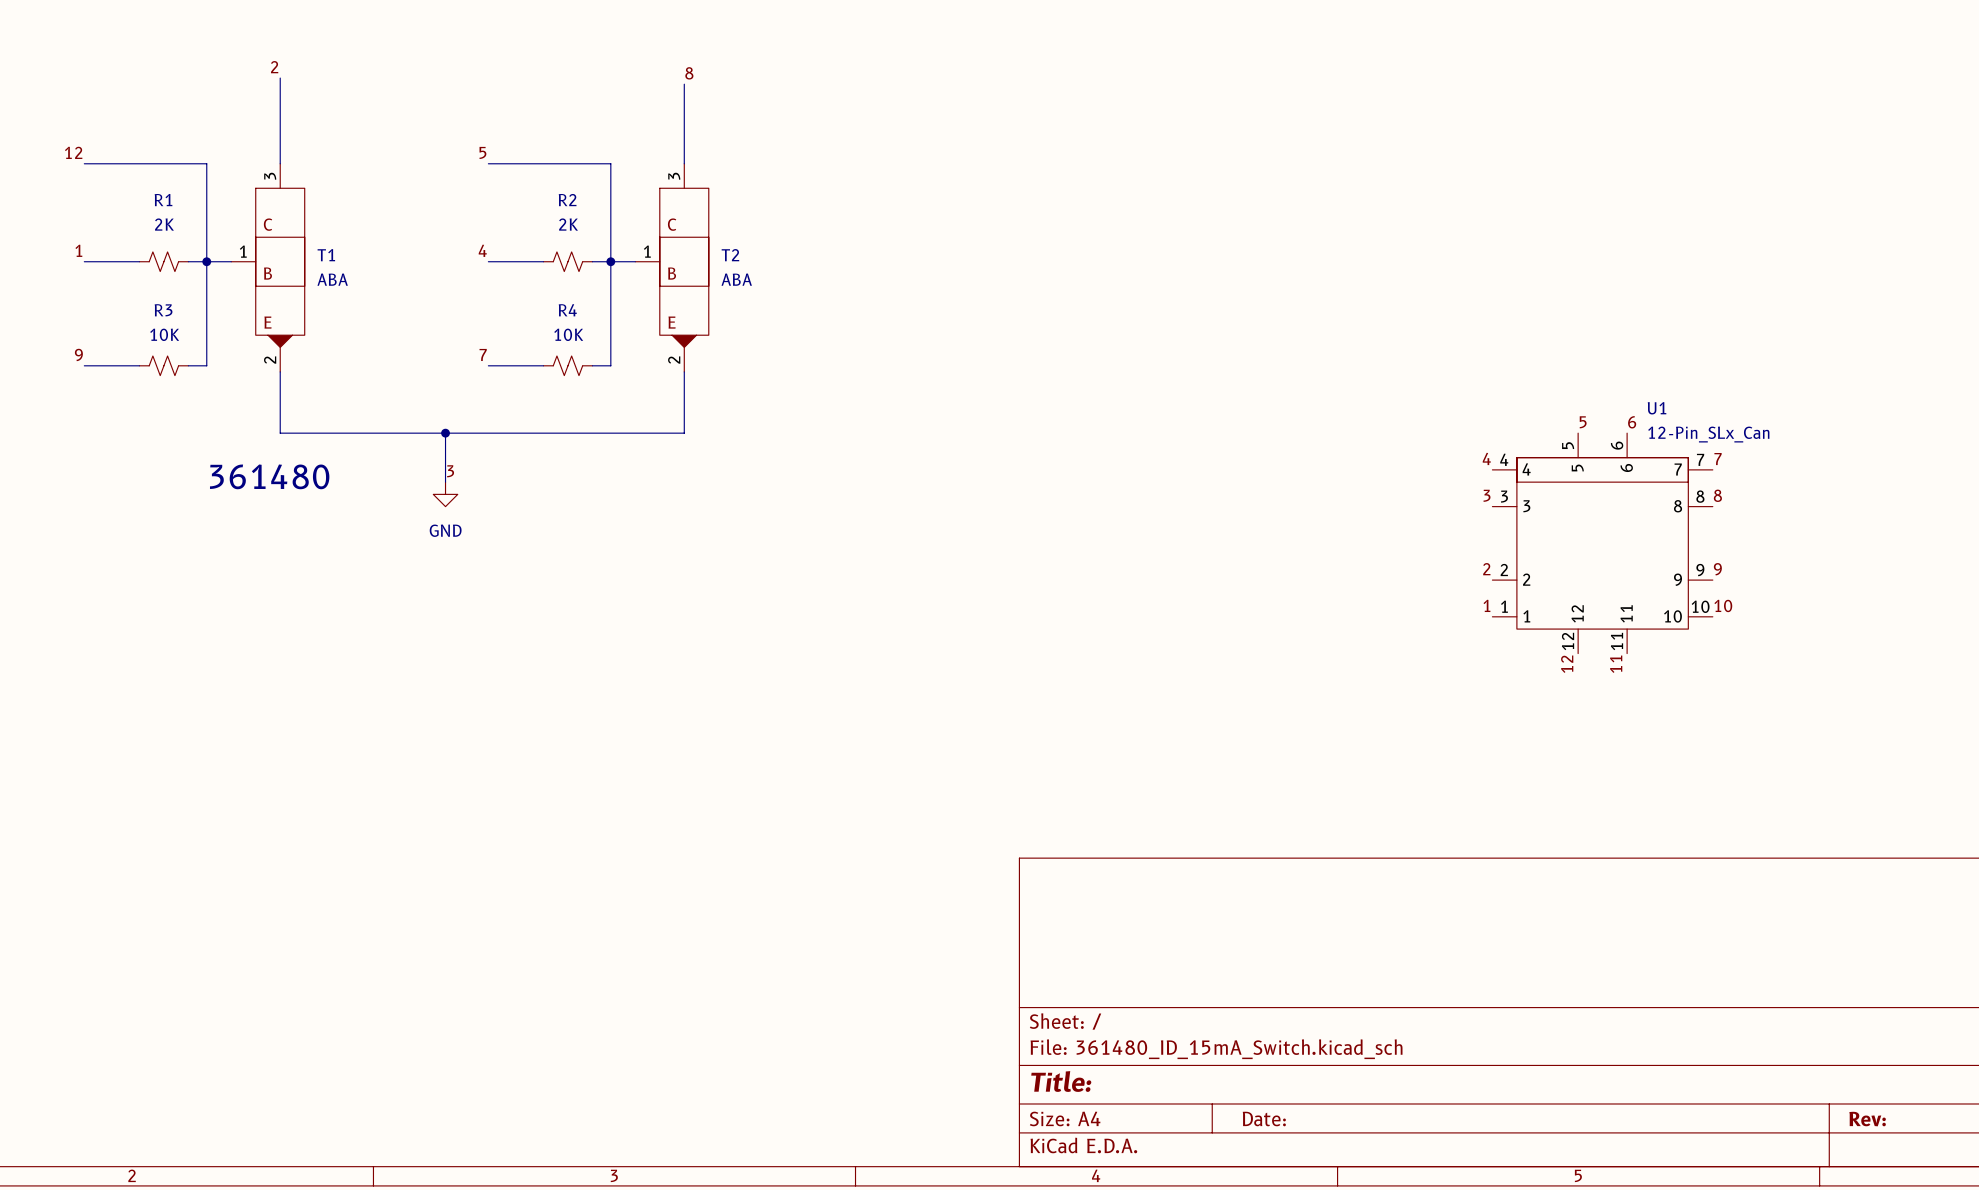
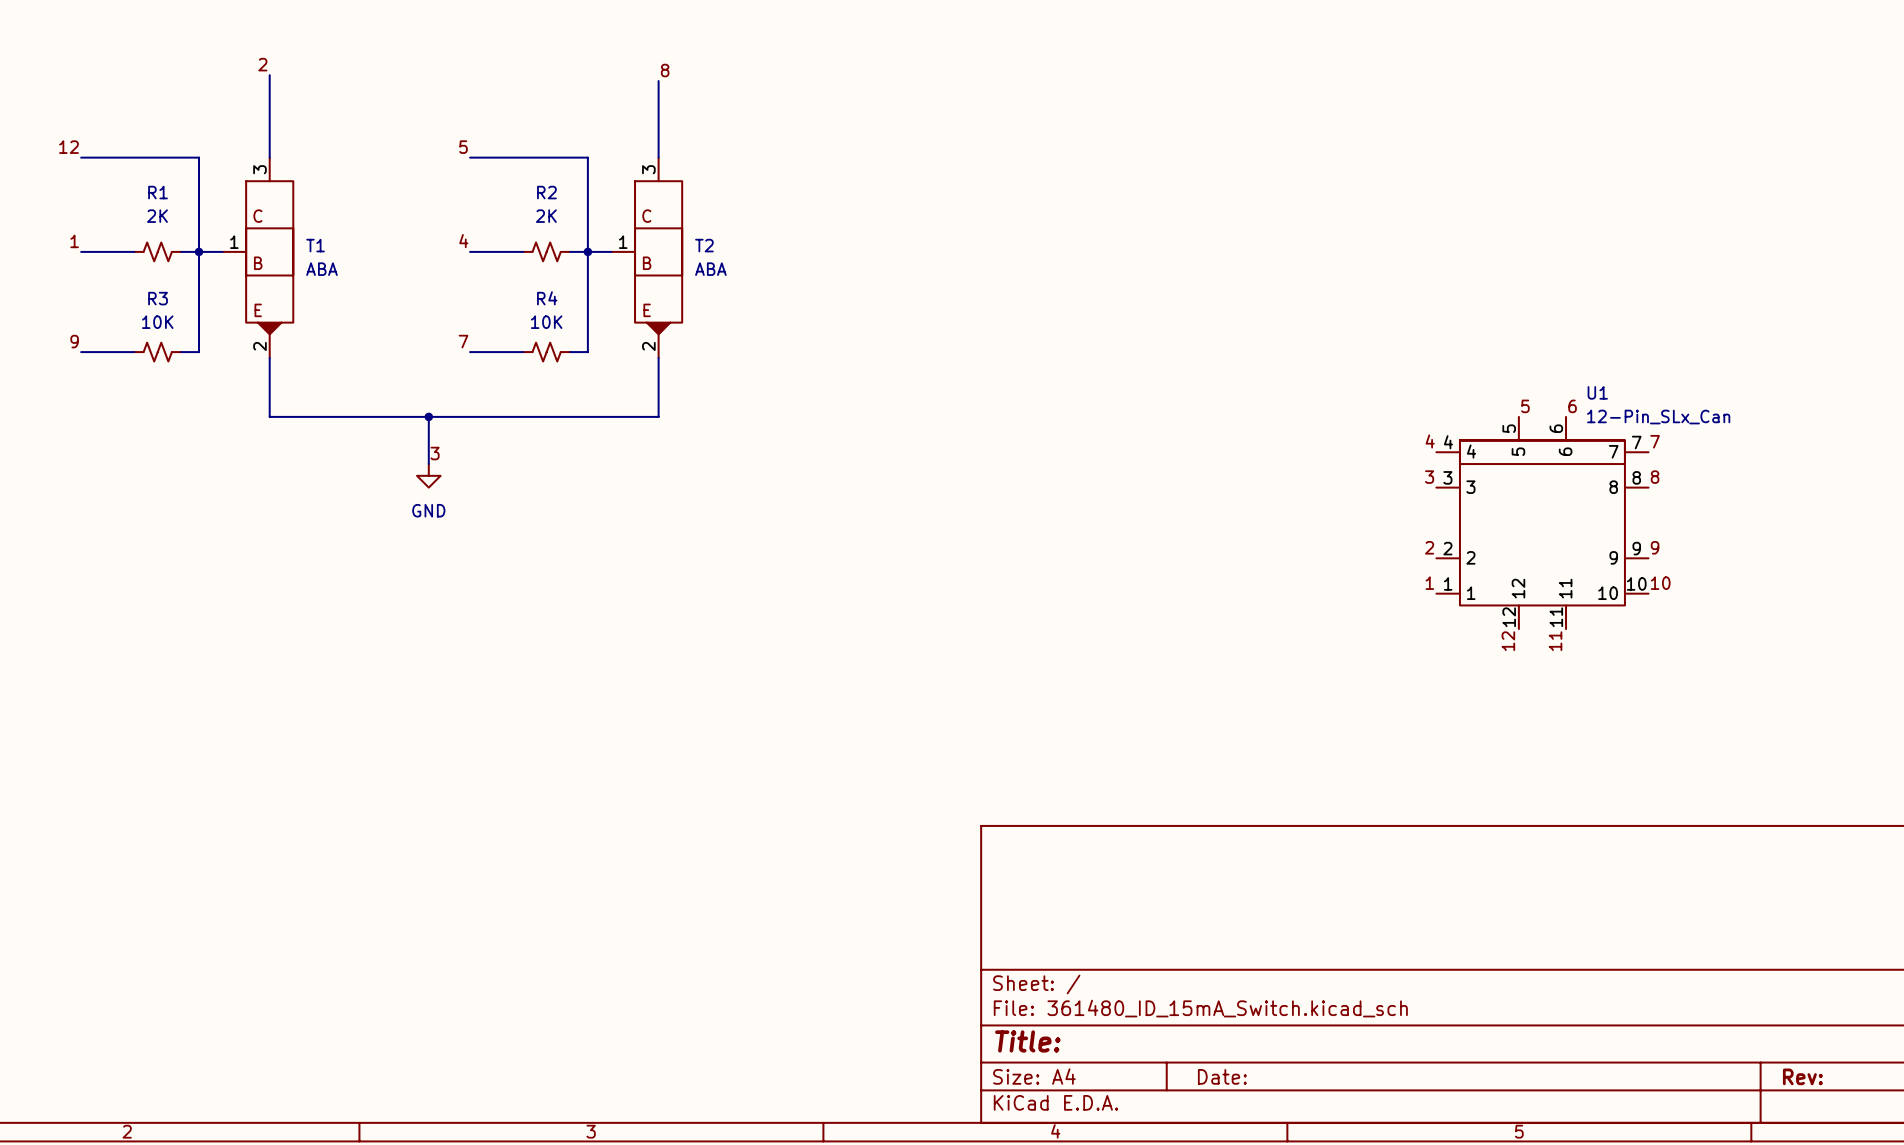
text: 361480 (269, 476) -> none

